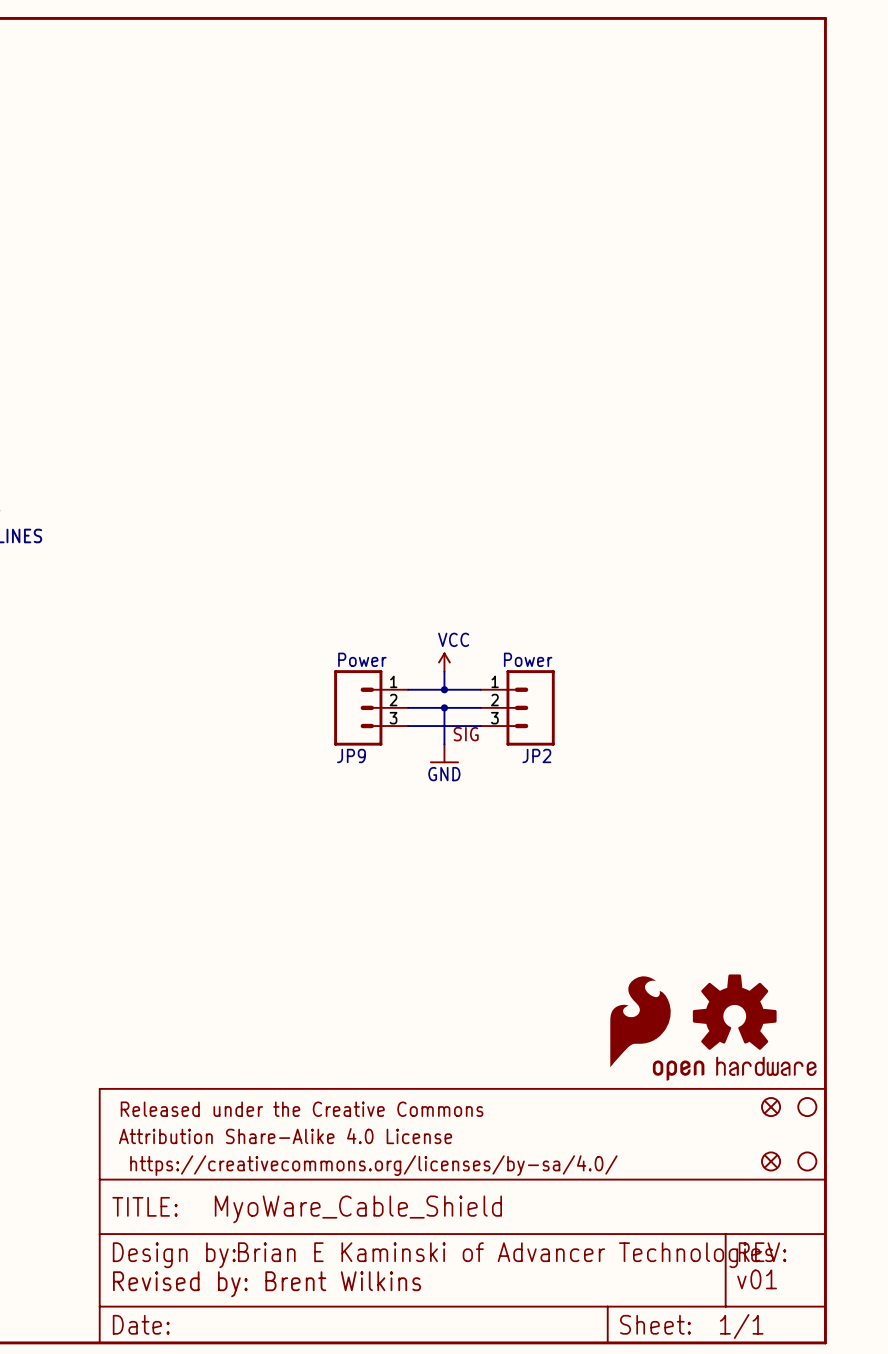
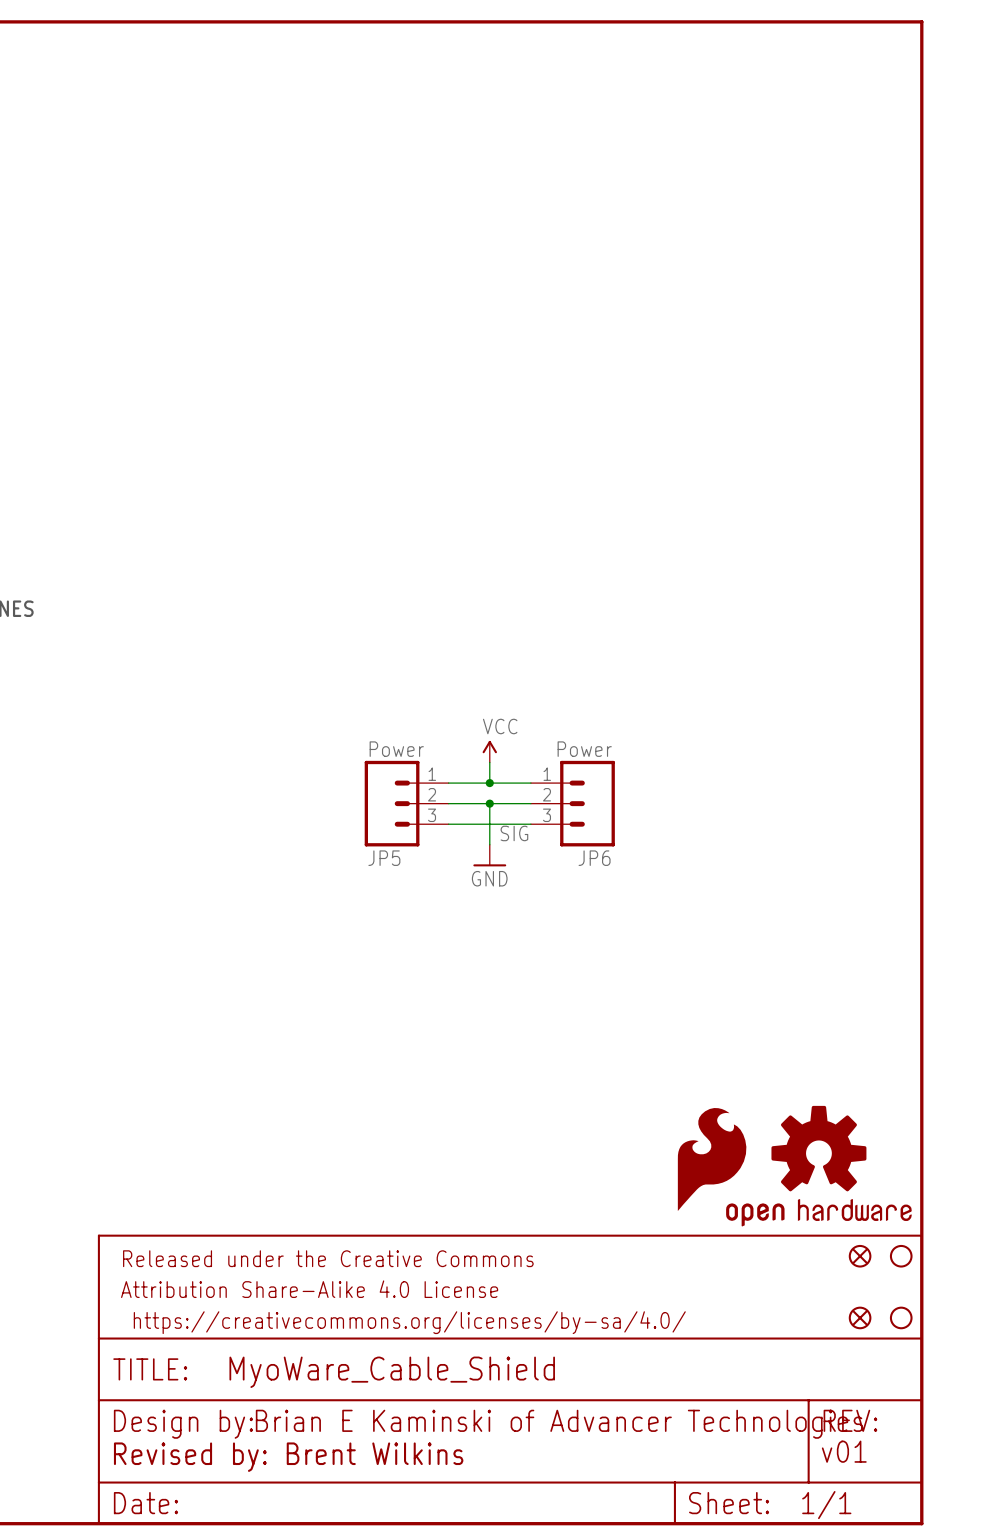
JP9 name: JP9 (351, 755) -> JP5 (384, 858)
JP2 name: JP2 (536, 755) -> JP6 (594, 858)

